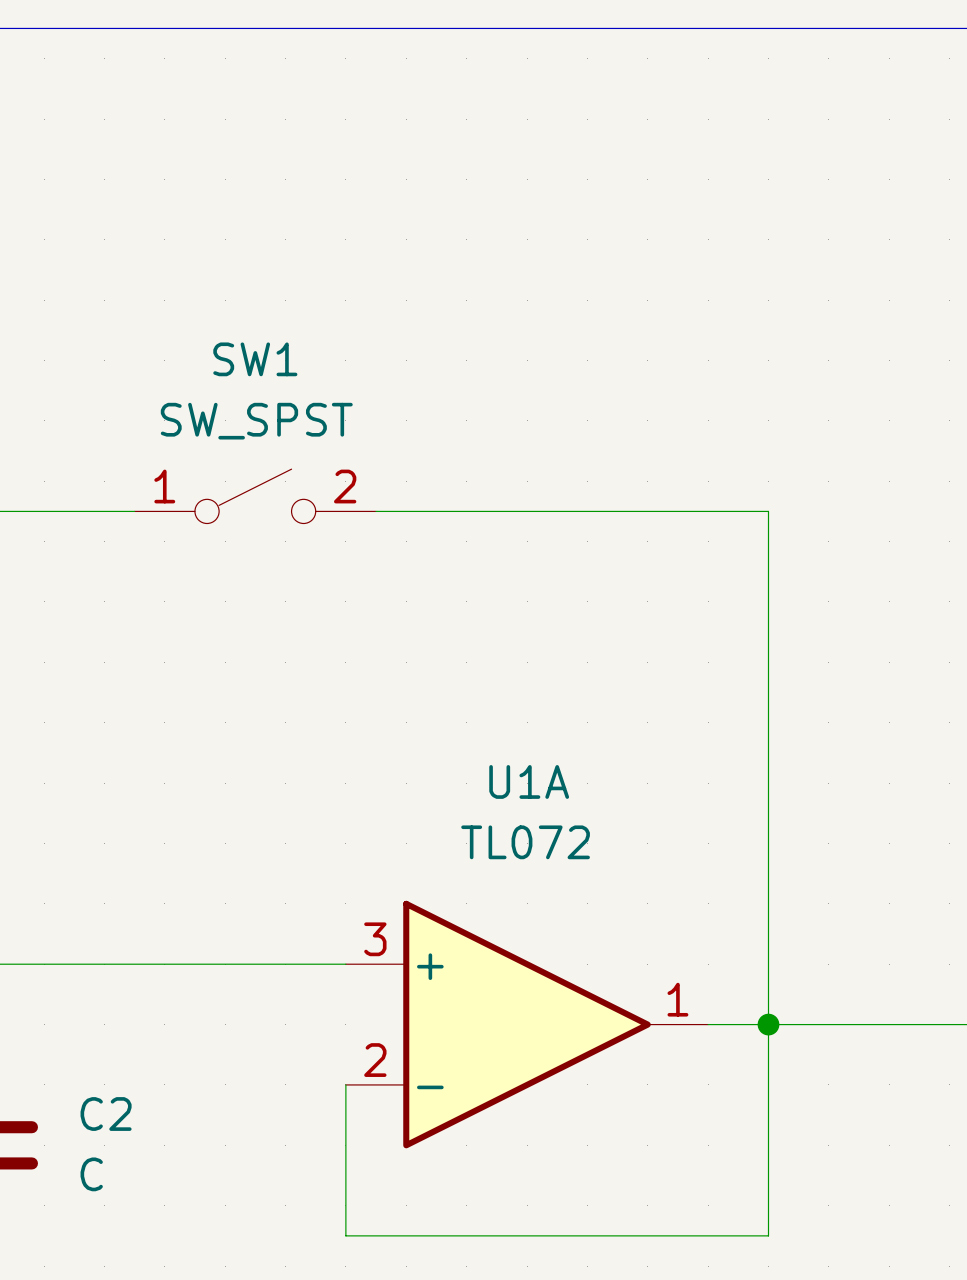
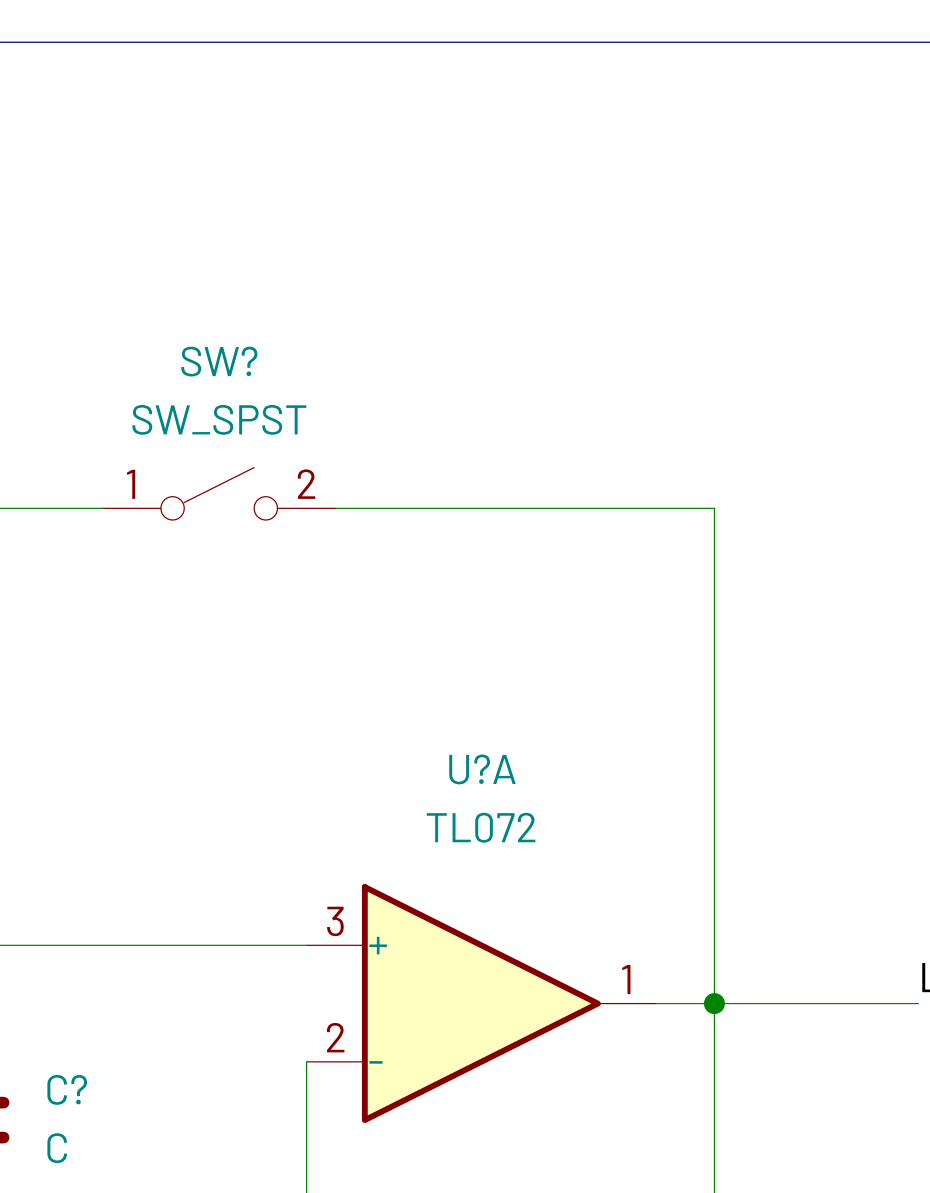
SW1 name: SW1 (255, 359) -> SW? (219, 361)
U1A name: U1A (529, 781) -> U?A (482, 769)
C2 name: C2 (106, 1114) -> C? (67, 1089)

